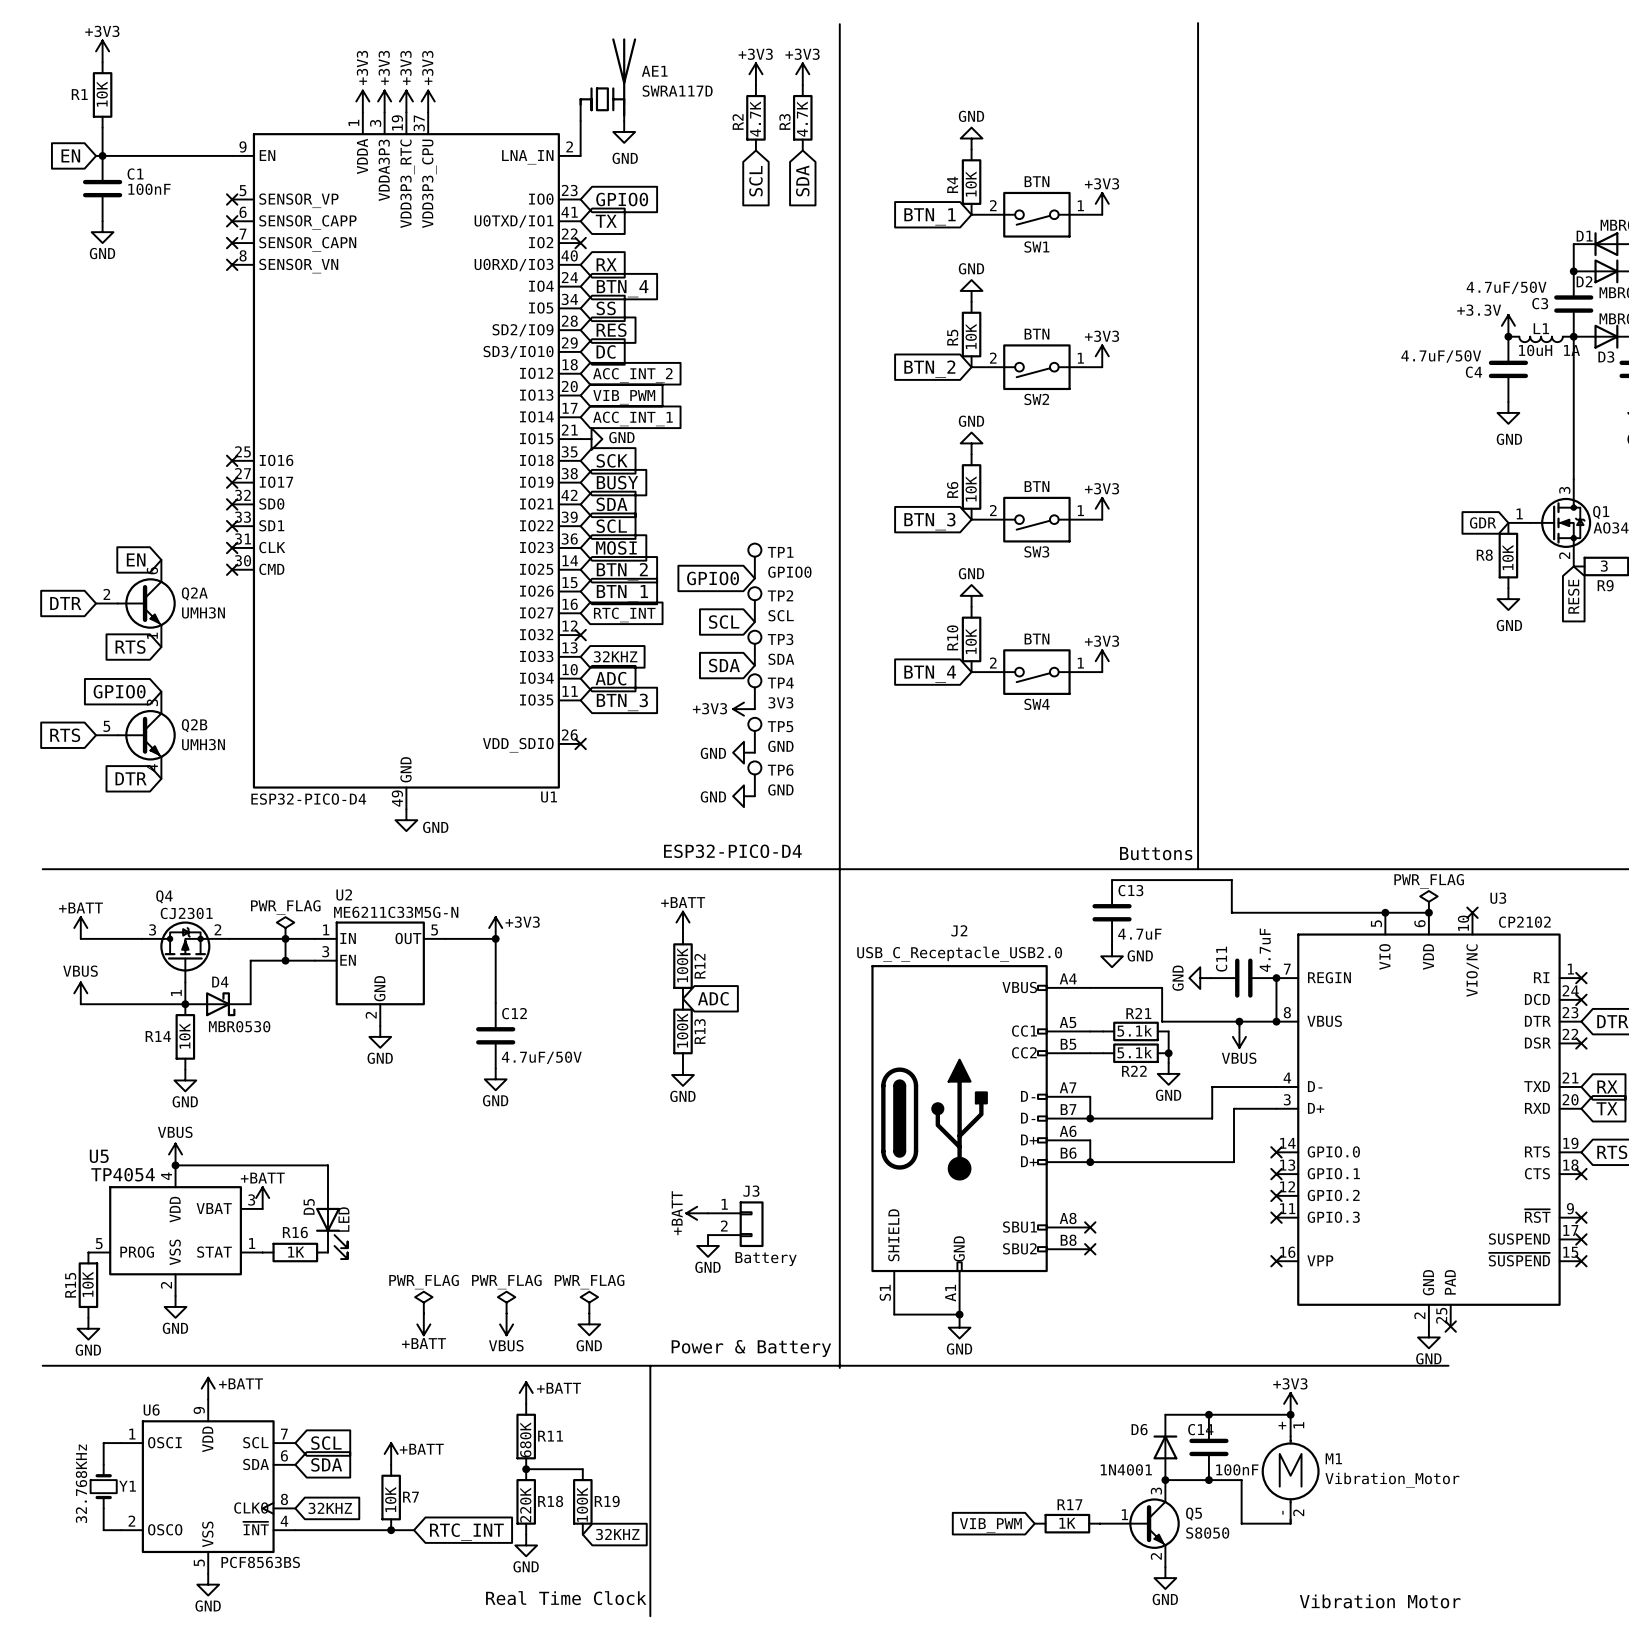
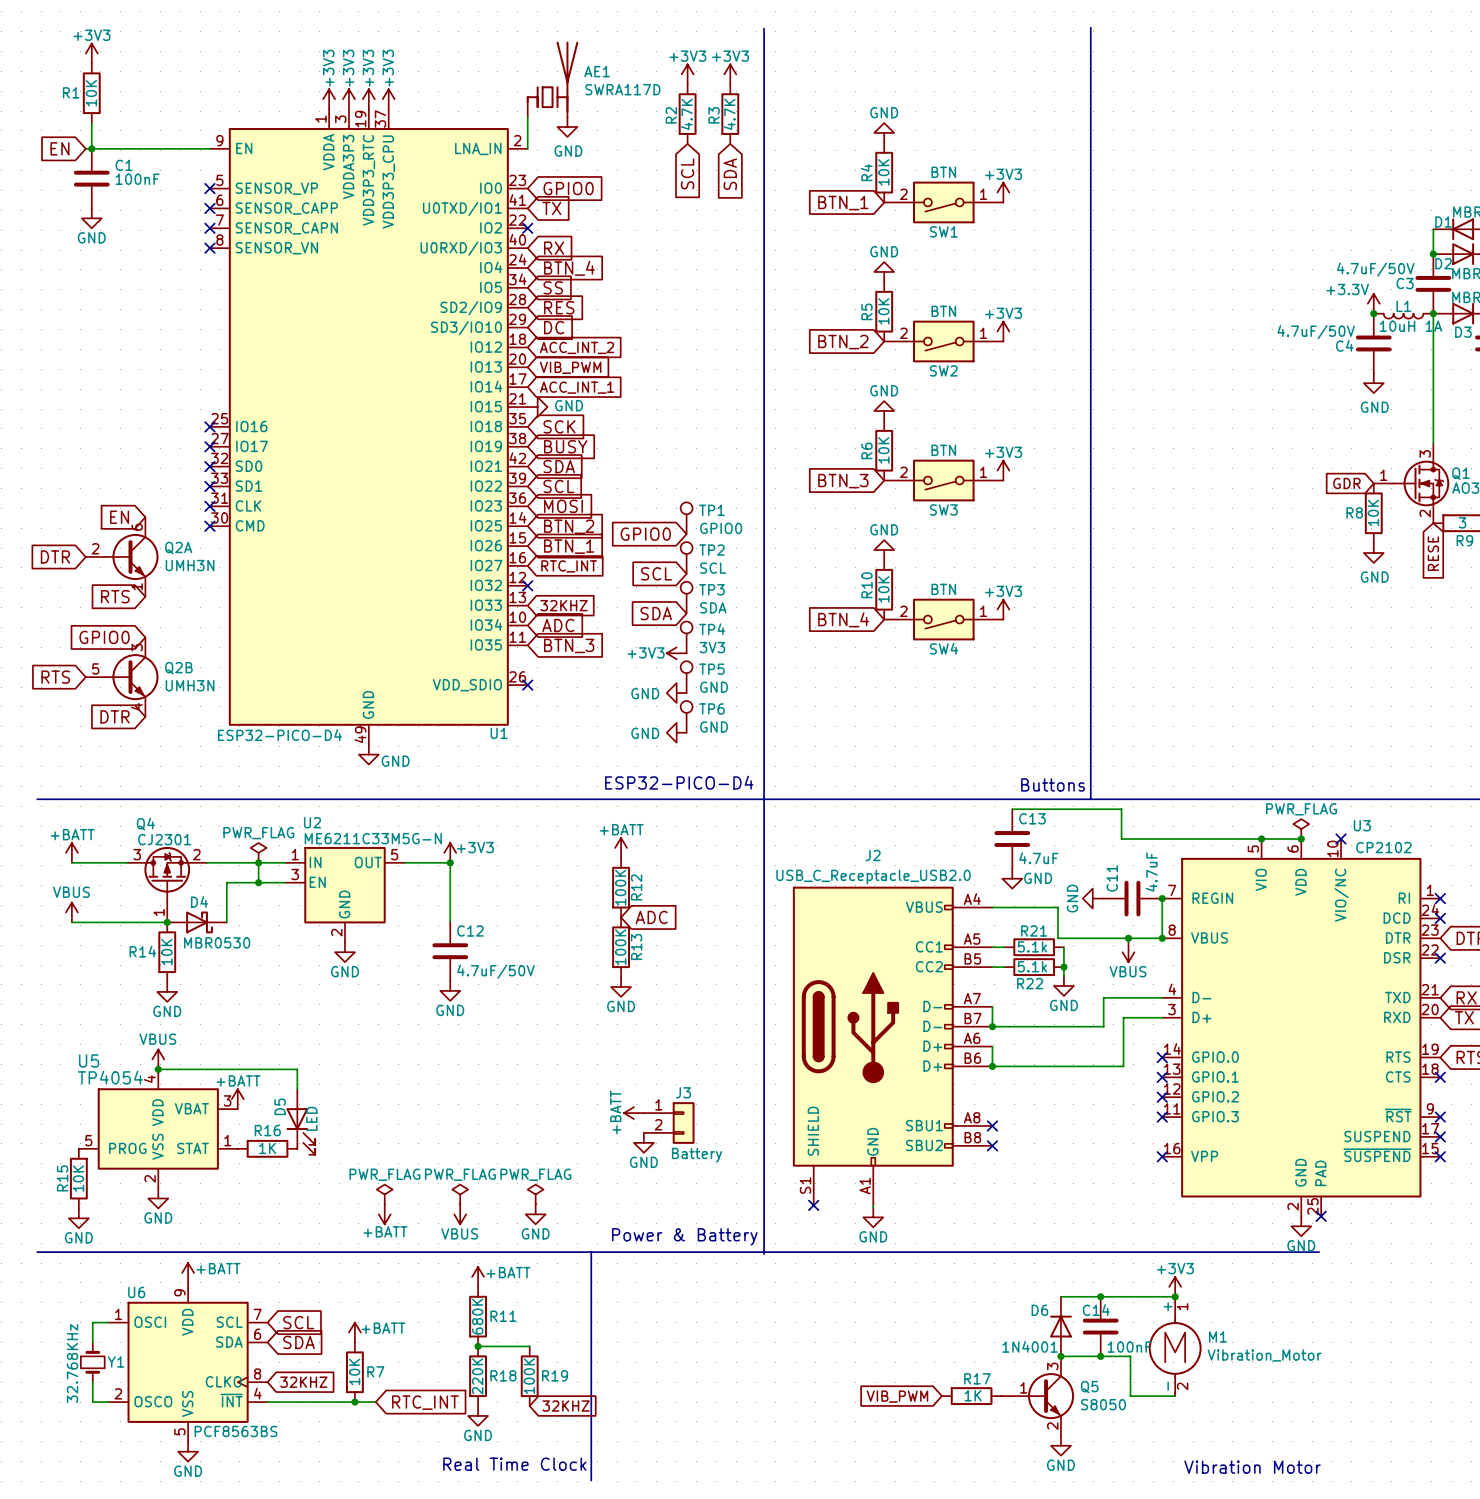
wire: (894, 1314) (959, 1314) -> none
no-connect mark: none -> (813, 1205)
junction: (959, 1314) -> none

